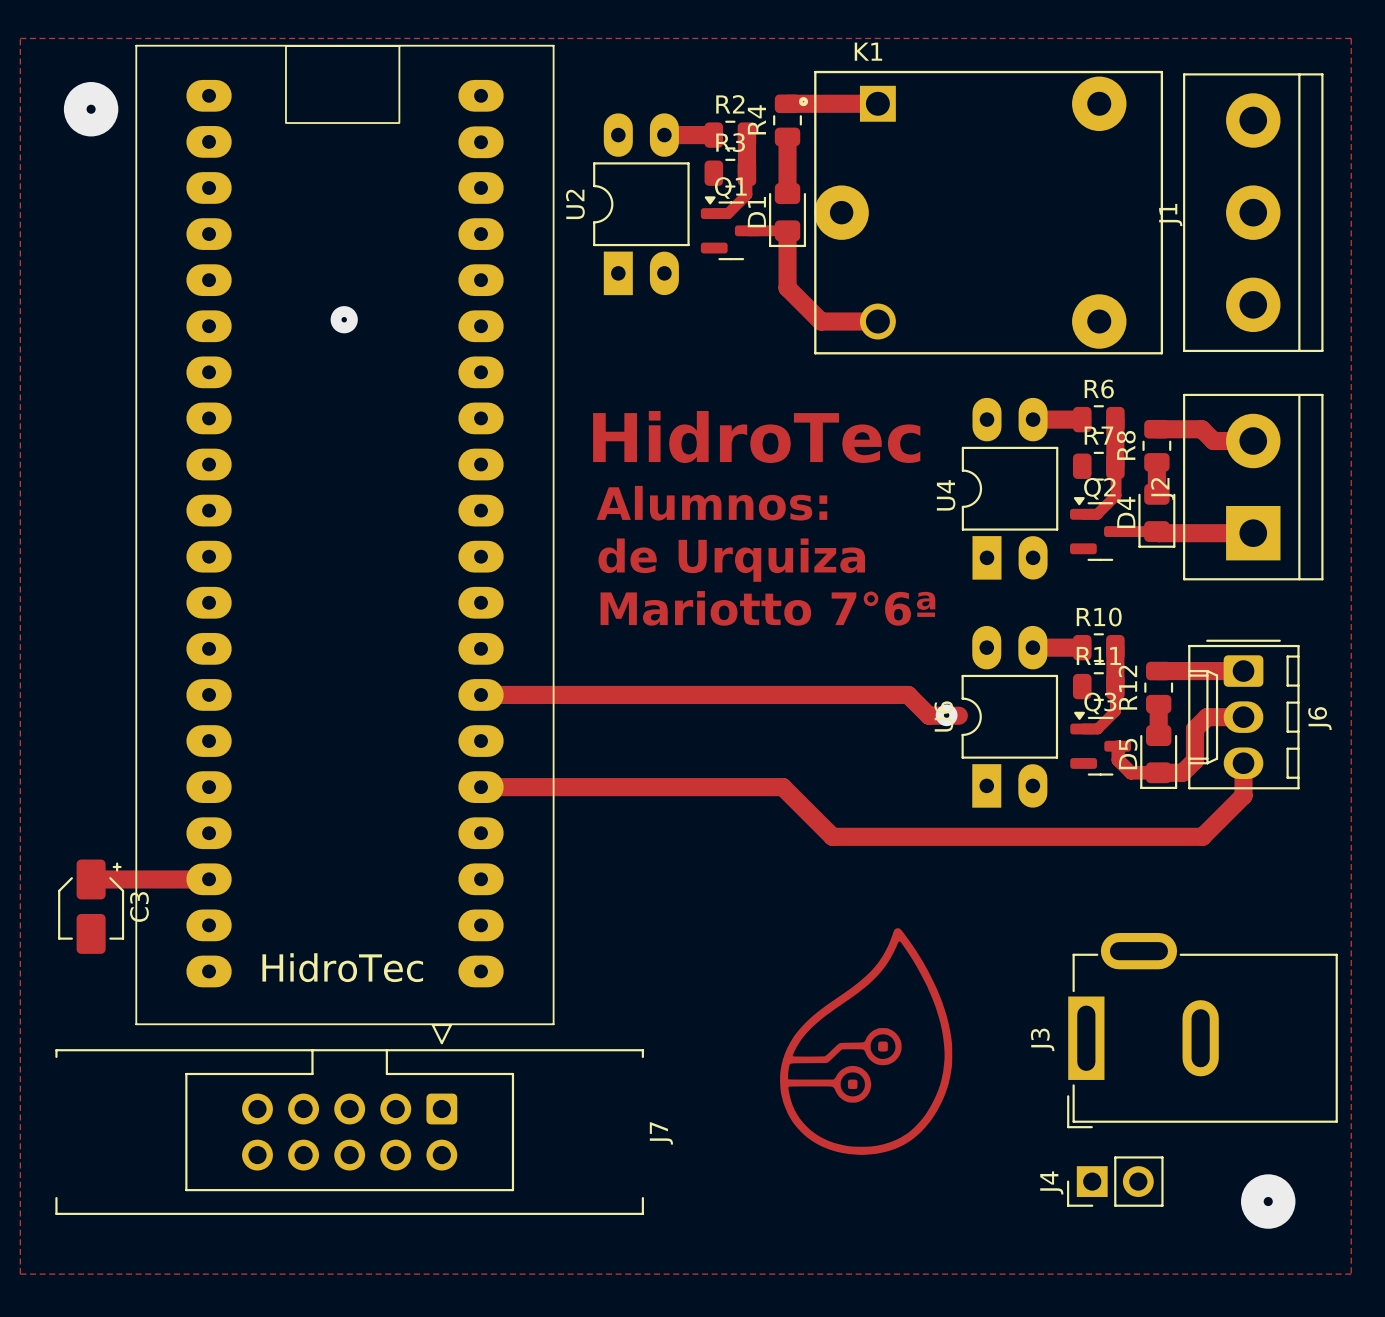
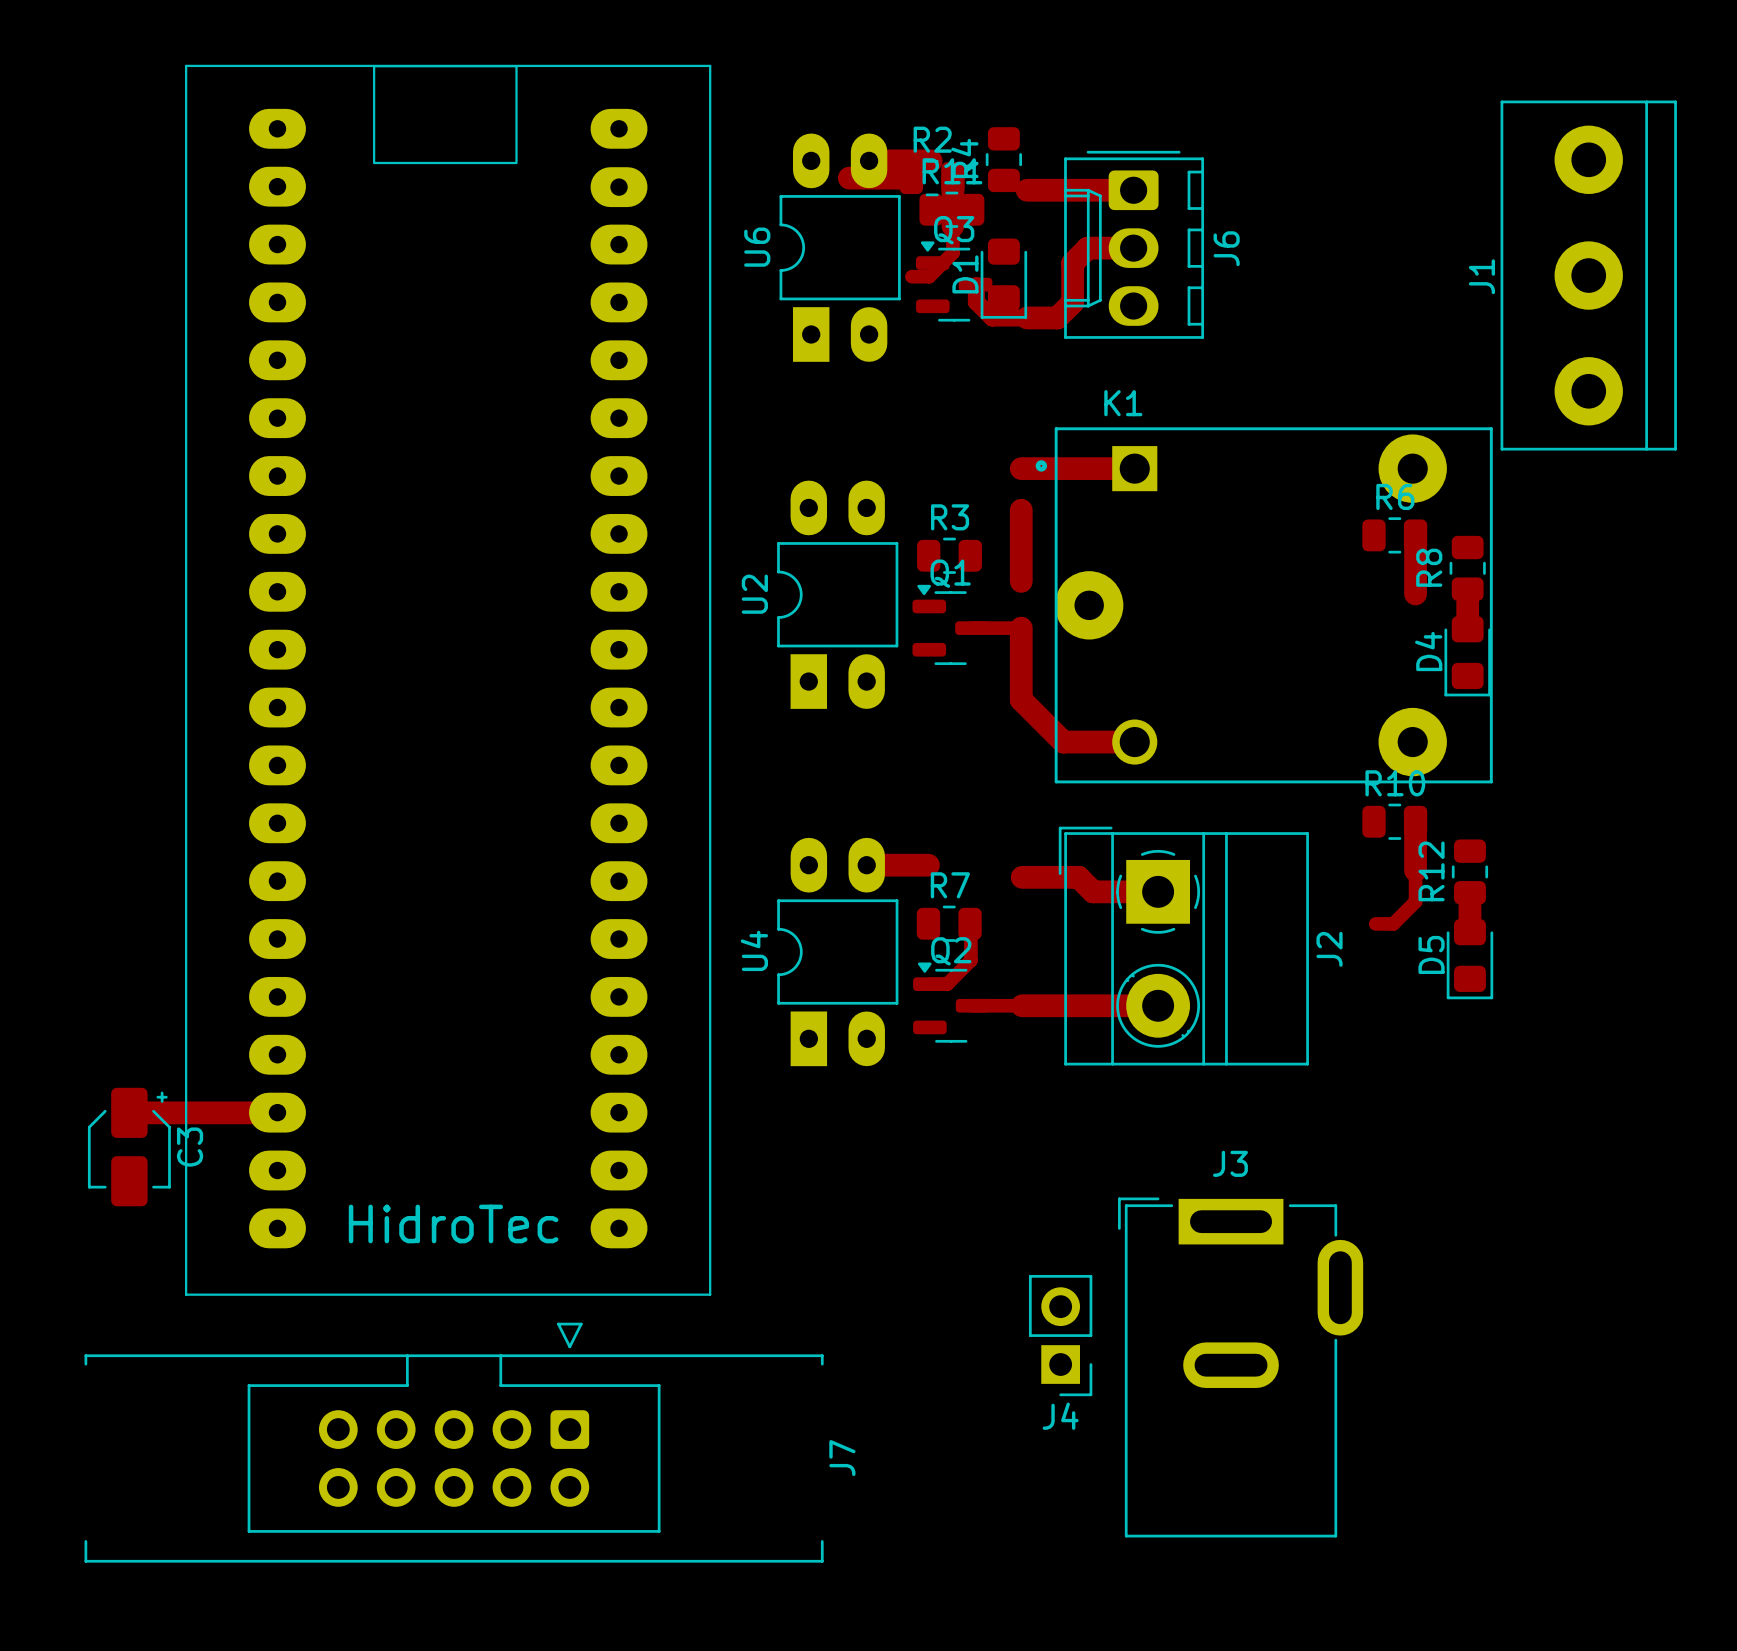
zone outline: (20, 38) (1351, 38) (1351, 1274) (20, 1274) (20, 38) -> none
track: (787, 103) (877, 103) -> (1021, 468) (1134, 468)
via: (91, 109) -> none
track: none -> (869, 160) (931, 160)
track: (787, 136) (787, 193) -> (1021, 510) (1021, 581)
track: none -> (1027, 190) (1133, 190)
R3 position: (730, 173) -> (949, 555)
track: none -> (1133, 248) (1087, 248) (1072, 263) (1072, 302) (1057, 317) (992, 317) (976, 302) (976, 285)
U2 position: (641, 204) -> (837, 594)
K1 position: (981, 212) -> (1264, 605)
Q1 position: (731, 228) -> (950, 624)
track: (748, 230) (787, 230) (787, 287) (821, 321) (877, 321) -> (971, 628) (1021, 628) (1021, 699) (1063, 742) (1134, 742)
via: (344, 319) -> none
J2 footprint: [1183, 393, 1324, 581] -> [1058, 826, 1309, 1066]
track: (1033, 419) (1082, 419) -> (866, 865) (928, 865)
track: (1156, 429) (1201, 429) (1213, 441) (1253, 441) -> none
text: HidroTec (756, 436) -> none
R7 position: (1098, 466) -> (949, 923)
track: (1116, 476) (1116, 495) (1097, 514) (1083, 514) -> (970, 936) (970, 960) (947, 984) (929, 984)
U4 position: (1010, 488) -> (837, 952)
J2 name position: J2 (1162, 488) -> J2 (1329, 949)
U4 name position: U4 (946, 495) -> U4 (754, 950)
text: Alumnos: (711, 503) -> none
Q2 position: (1100, 529) -> (951, 1002)
track: (1117, 531) (1253, 533) (1251, 531) -> none
text: de Urquiza (731, 560) -> none
text: Mariotto 7°6ª (767, 608) -> none
U6 footprint: [961, 625, 1059, 808] -> [779, 133, 901, 362]
track: (1032, 647) (1082, 647) -> none
track: (1158, 671) (1243, 671) -> none
R11 position: (1098, 686) -> (951, 209)
track: none -> (1022, 877) (1078, 877) (1093, 891) (1158, 891)
track: (481, 694) (908, 694) (928, 715) (958, 715) -> none
J6 position: (1243, 714) -> (1134, 244)
via: (946, 715) -> none
track: (1243, 717) (1207, 717) (1194, 729) (1194, 760) (1182, 772) (1131, 772) (1118, 760) (1118, 746) -> none
Q3 position: (1100, 743) -> (954, 281)
track: (1243, 763) (1243, 795) (1202, 836) (832, 836) (782, 787) (481, 787) -> none
track: none -> (972, 1005) (1158, 1005)
drawing: [780, 928, 953, 1155] -> none
J3 rotation: 0° (1202, 1030) -> 90° clockwise (1240, 1367)
J3 position: (1202, 1030) -> (1240, 1367)
J7 position: (349, 1119) -> (454, 1442)
J4 rotation: 0° (1115, 1181) -> 90° counterclockwise (1060, 1335)
J4 position: (1115, 1181) -> (1060, 1335)
via: (1268, 1201) -> none

